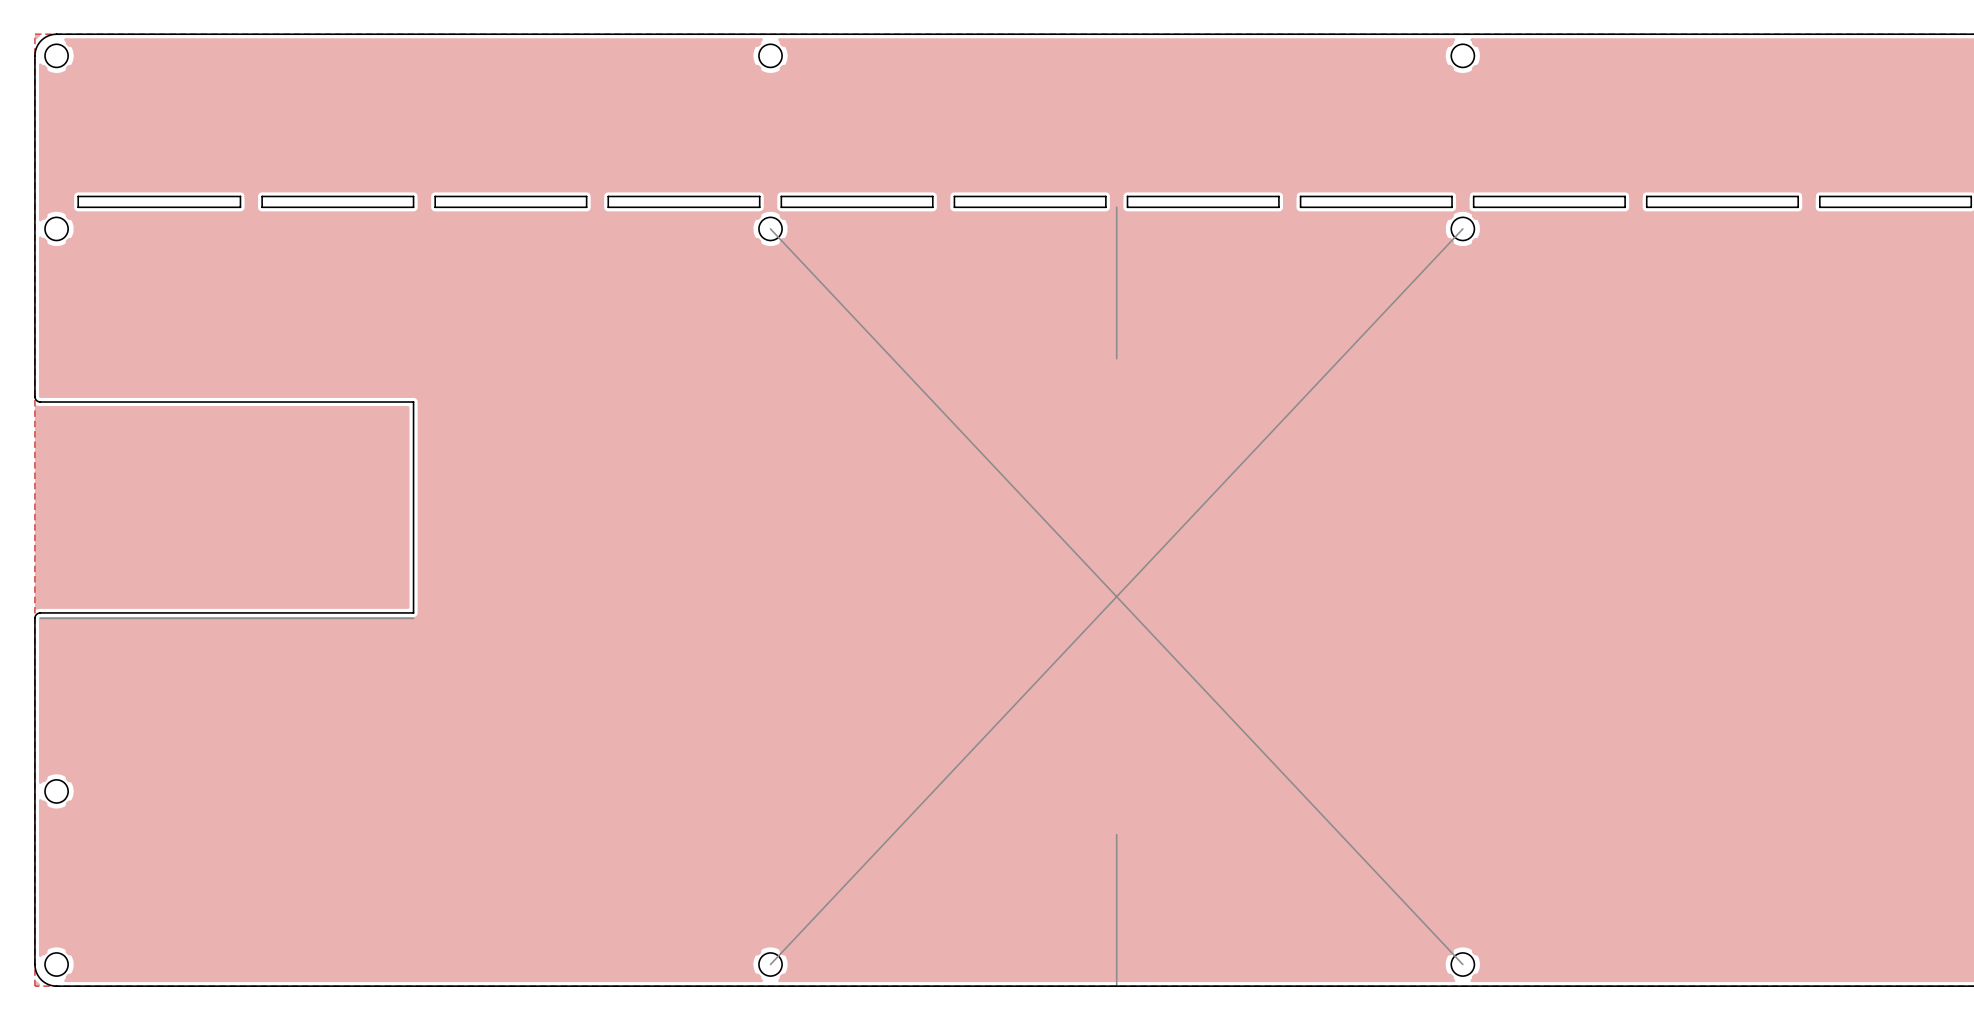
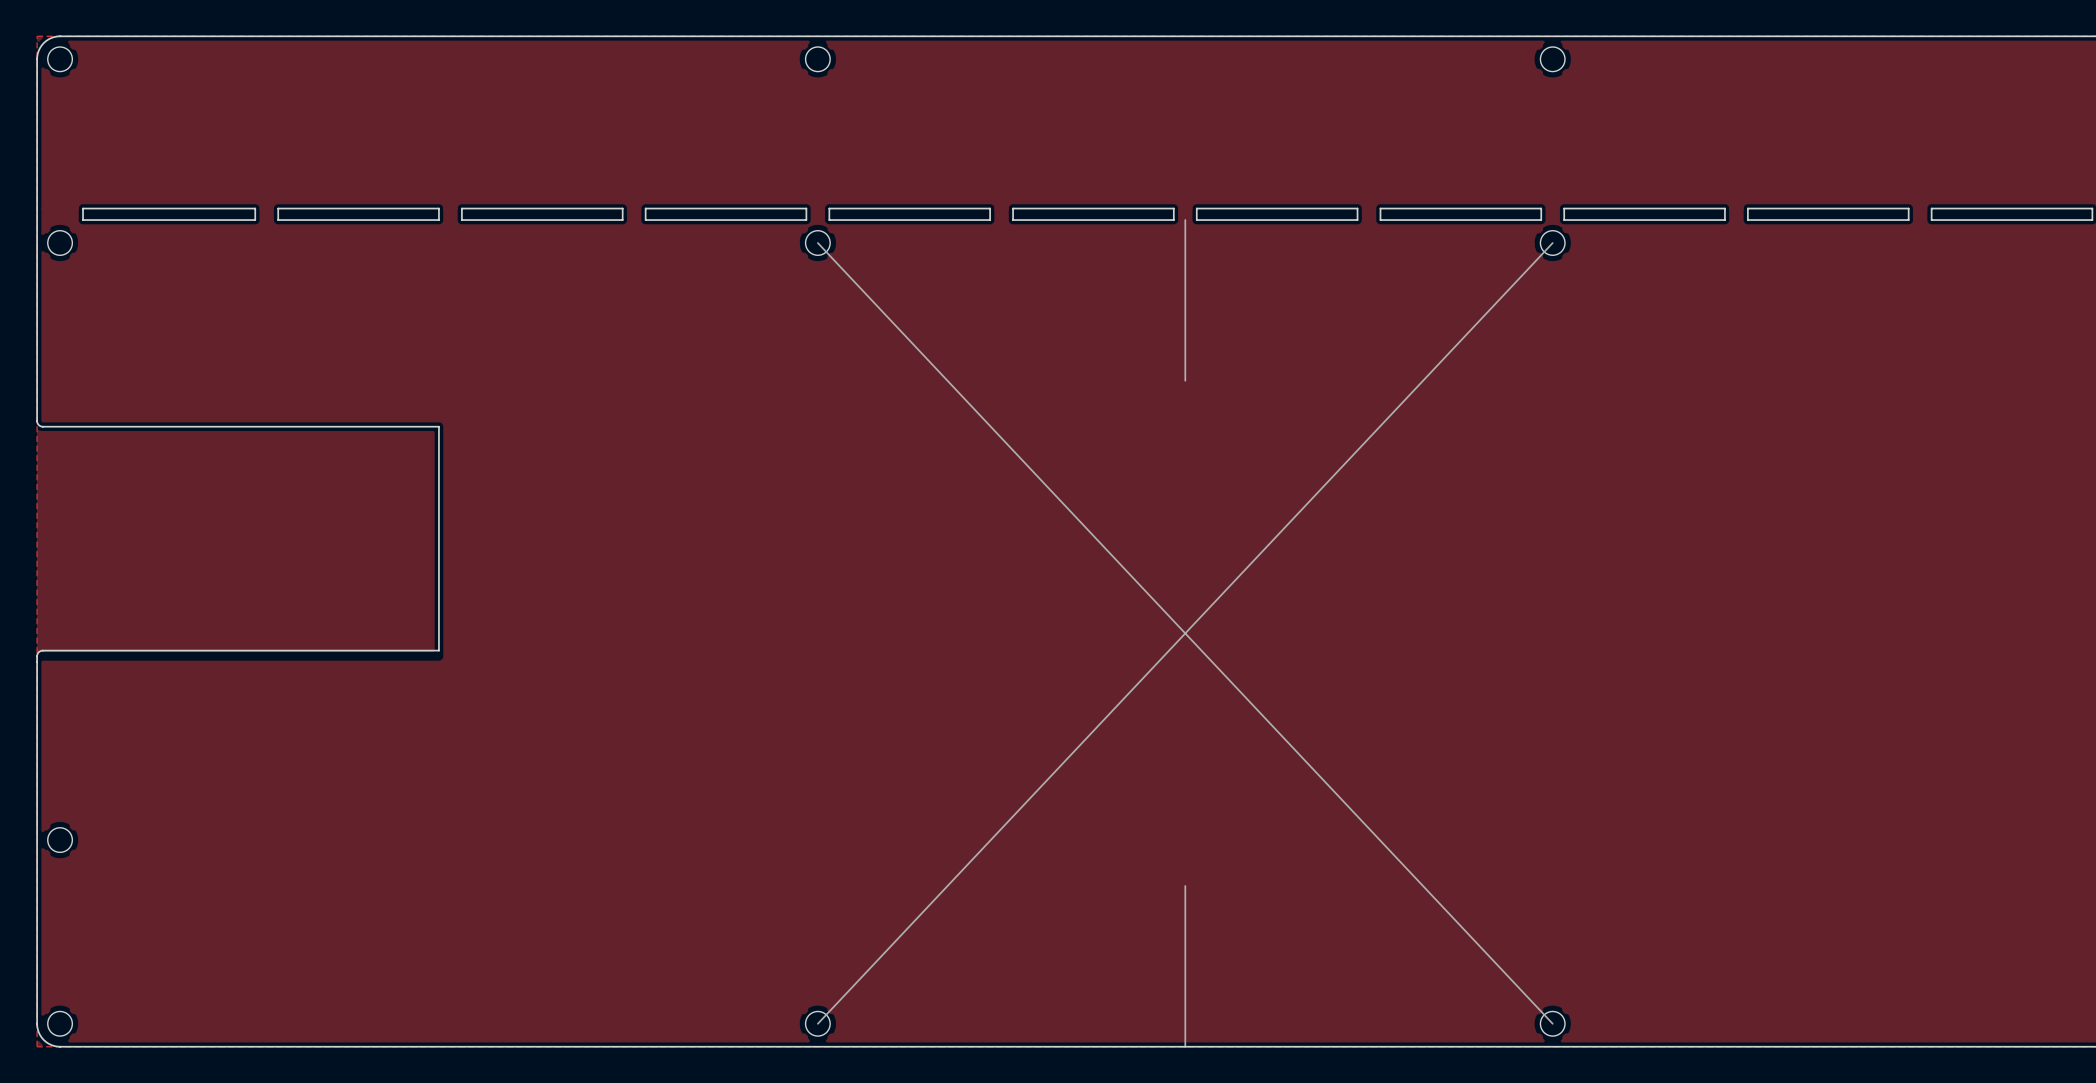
line: (40, 618) (413, 618) -> none

